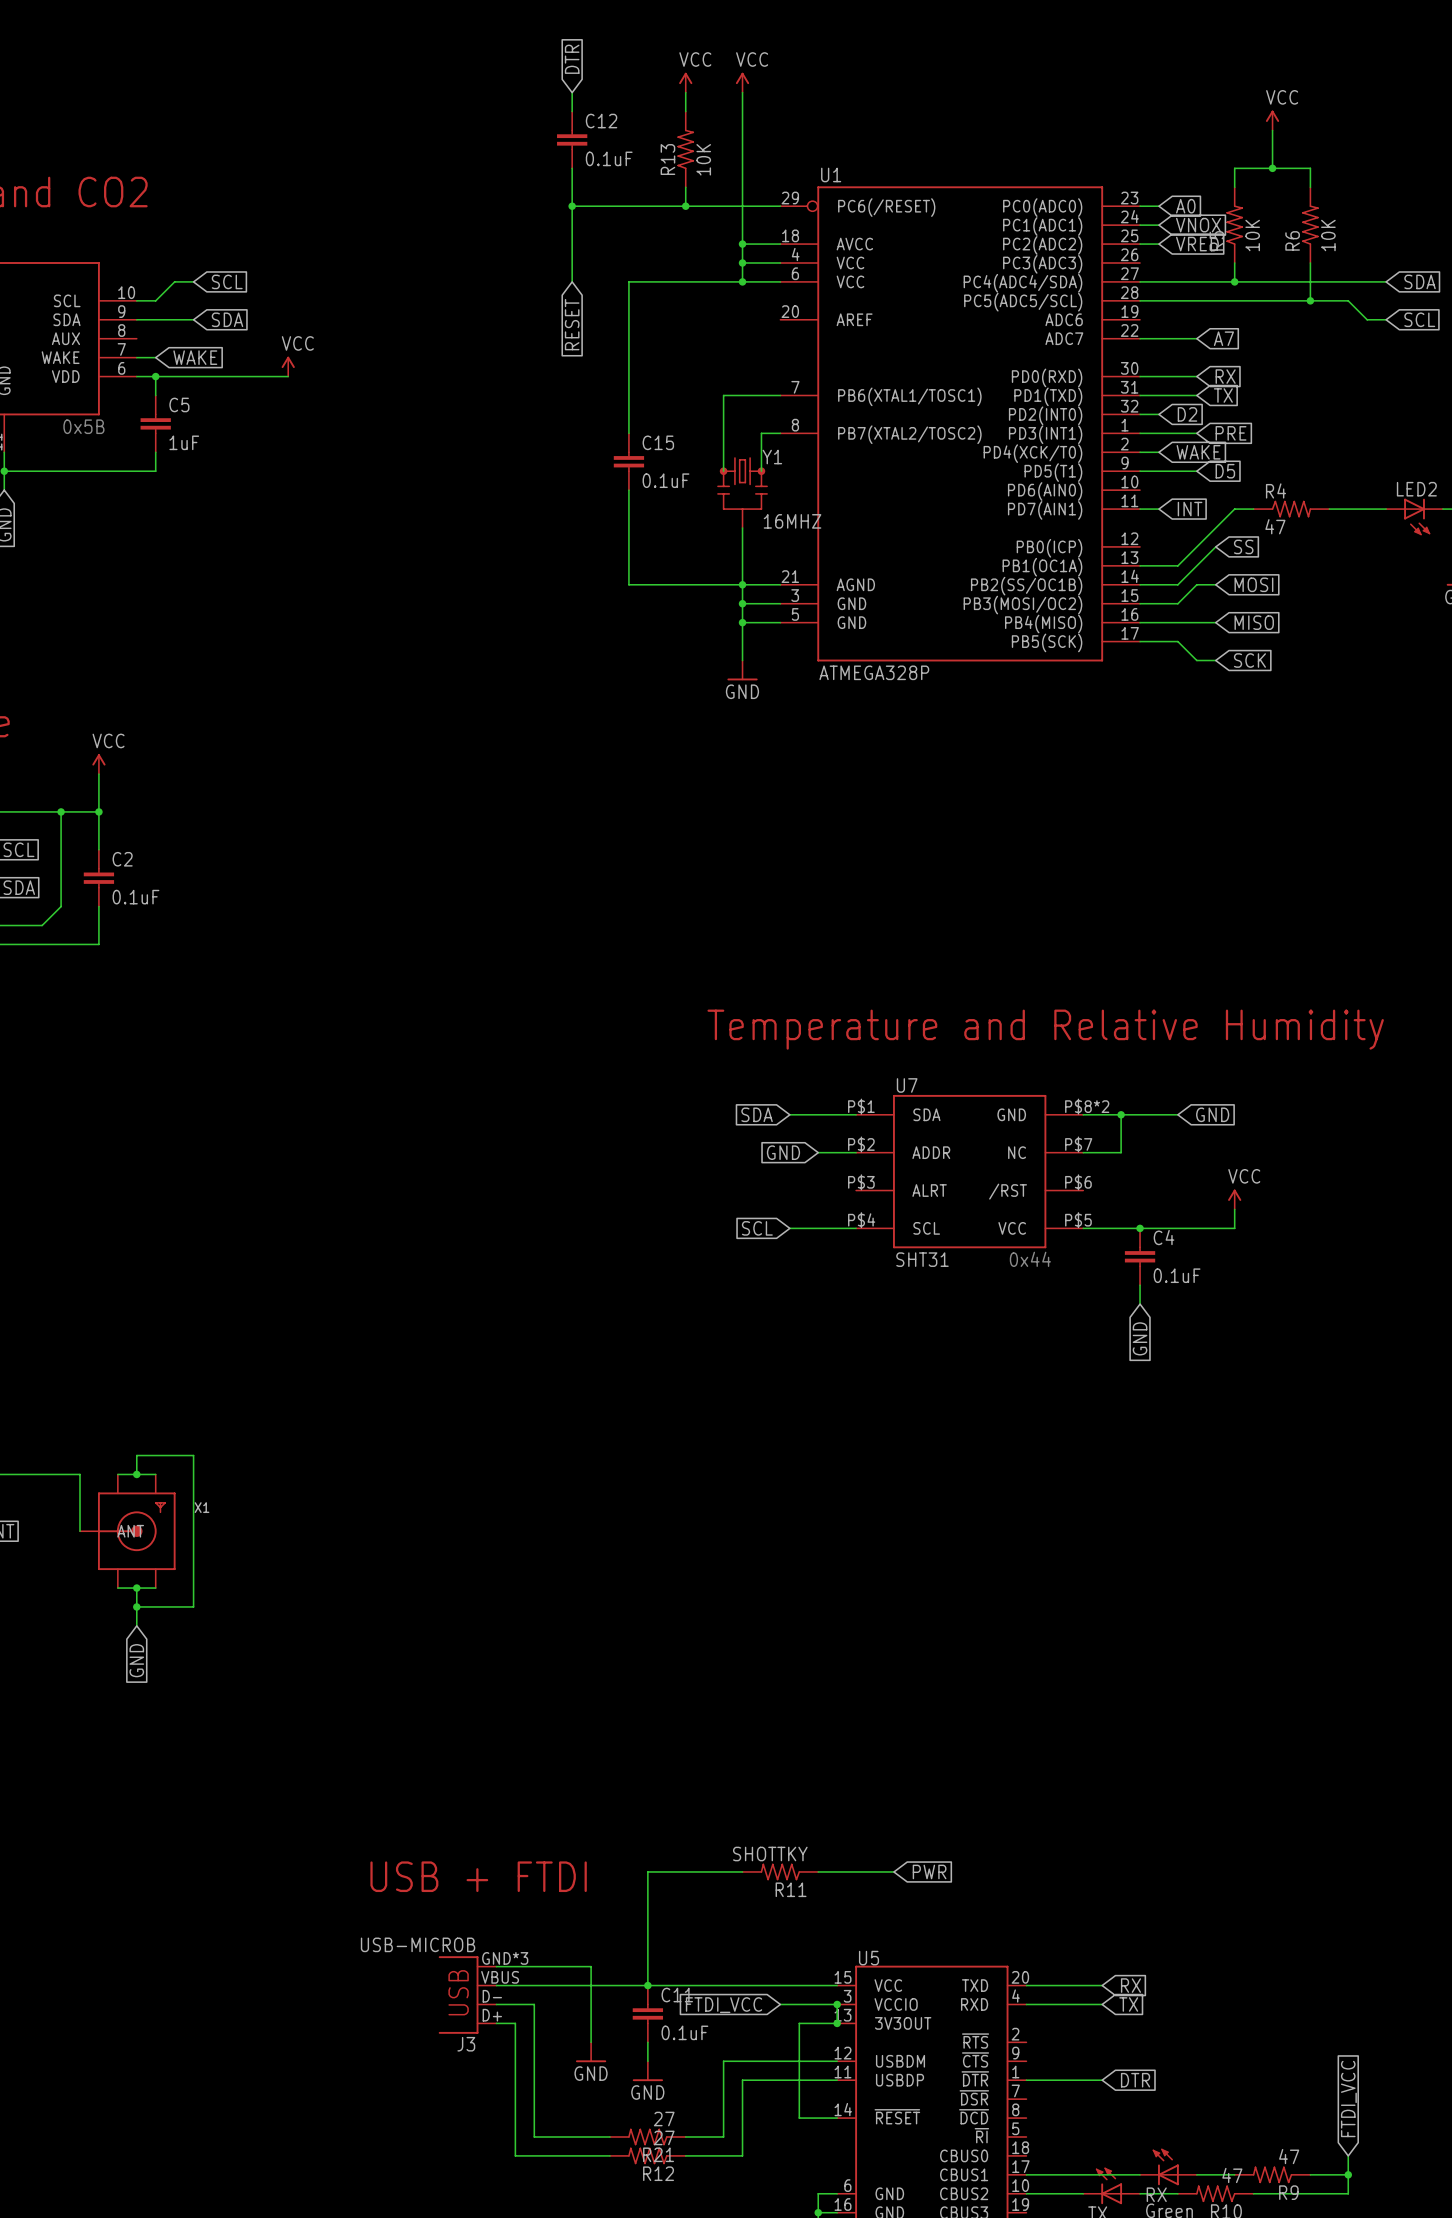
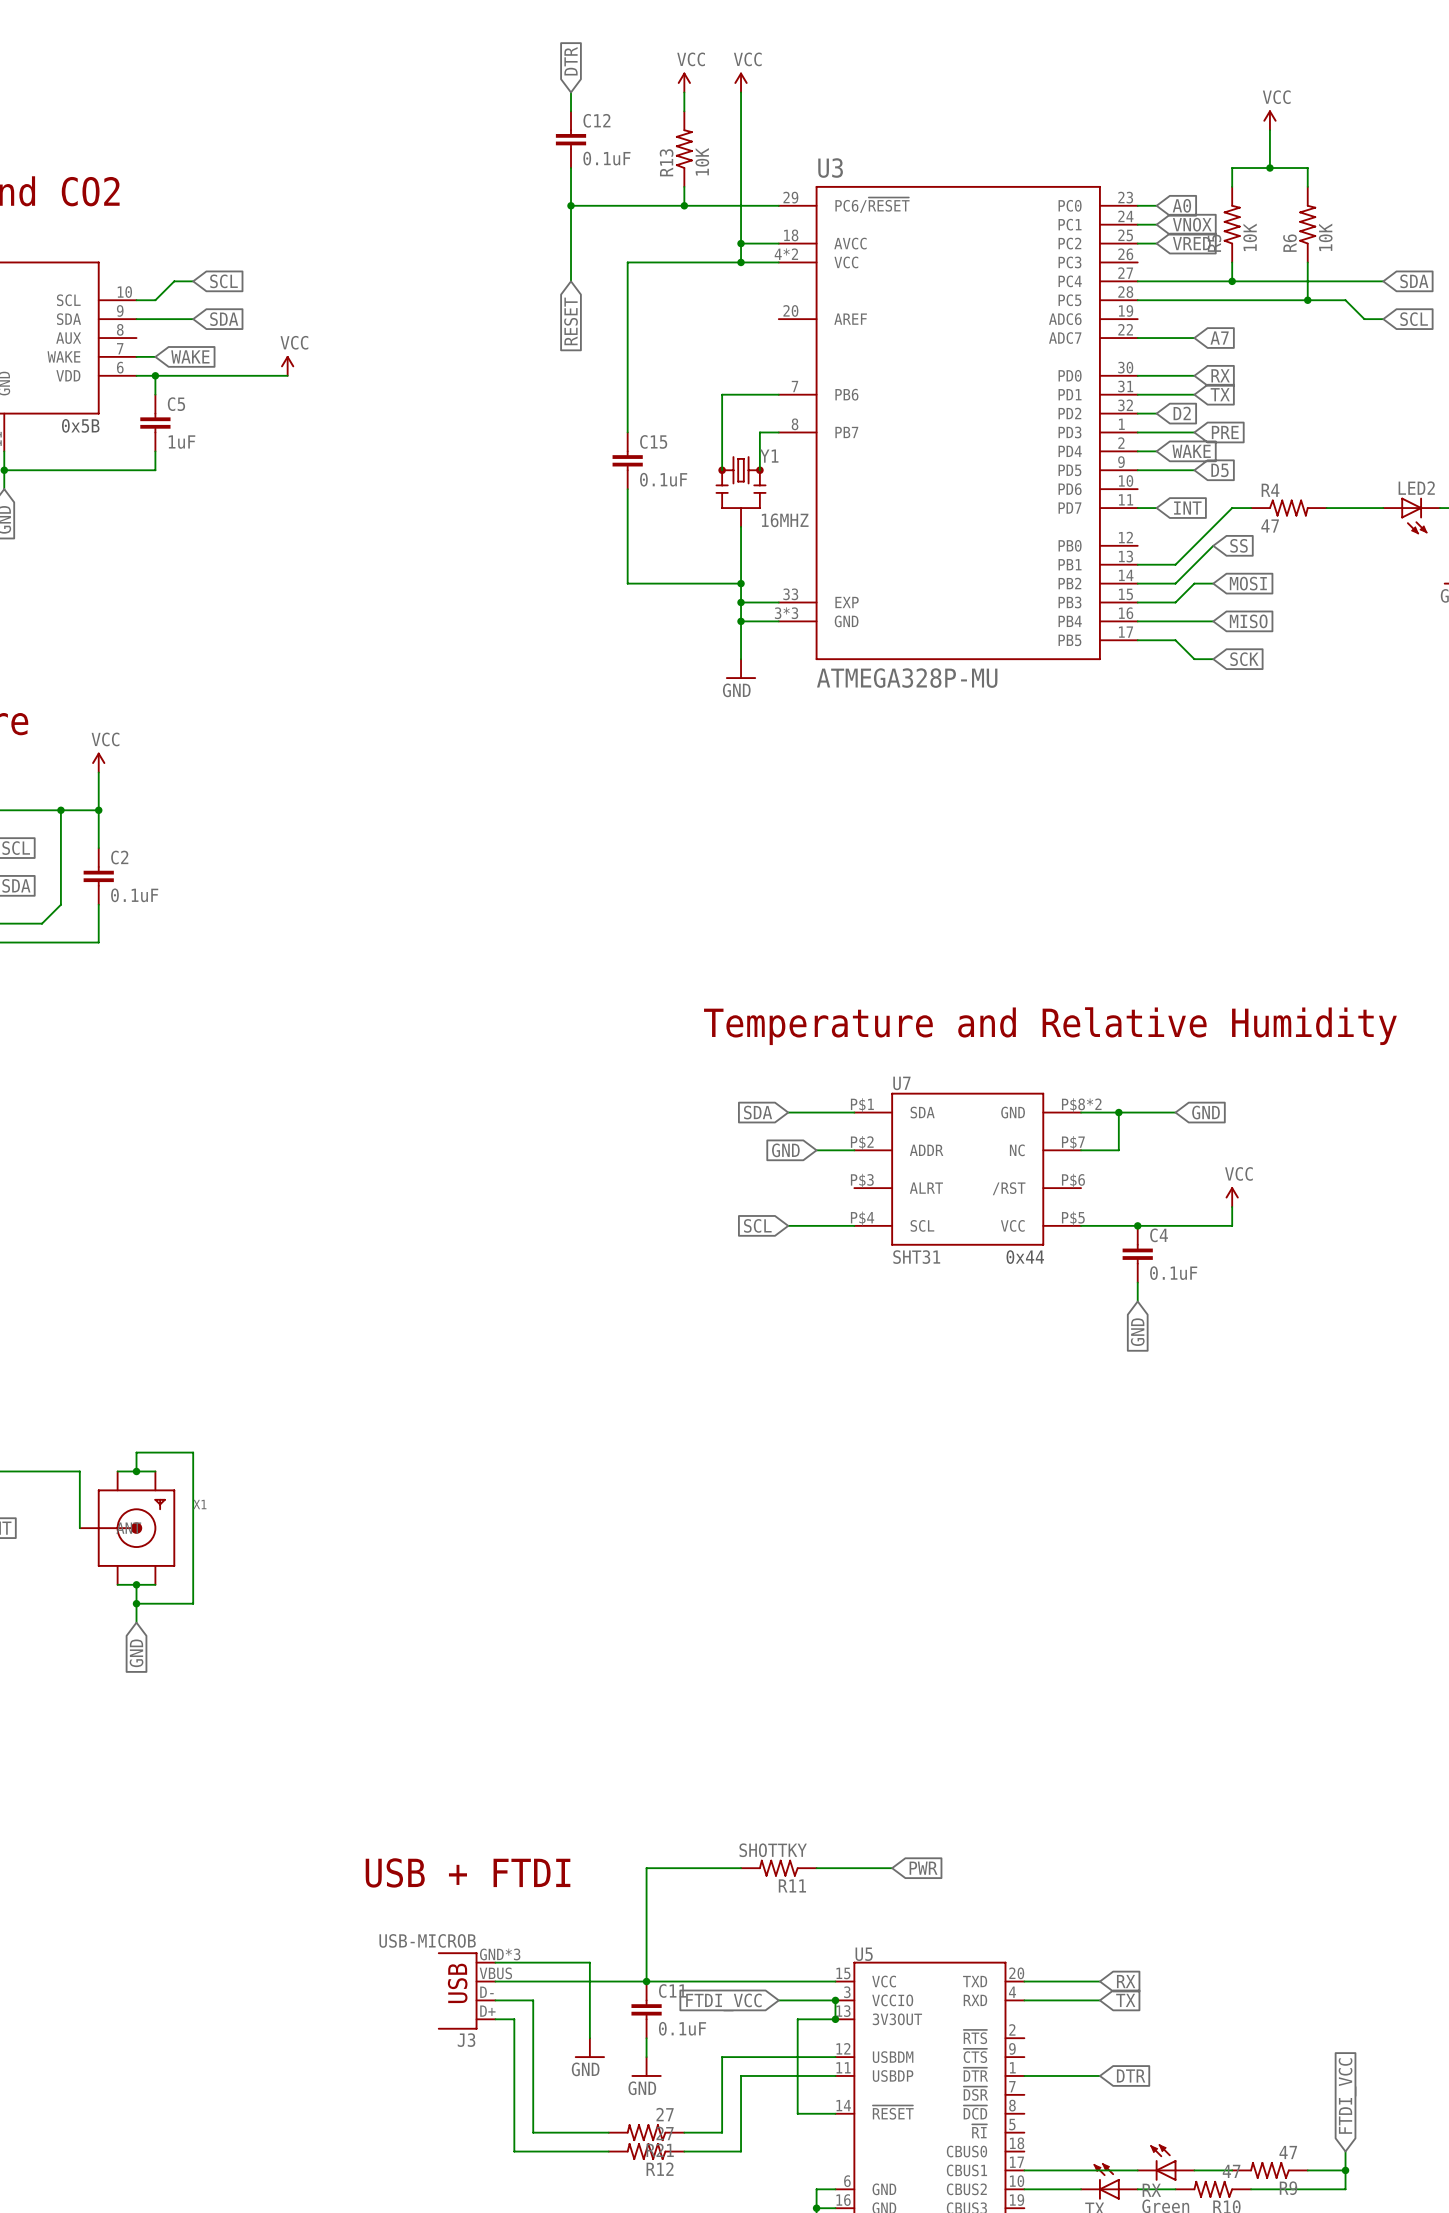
wire: (742, 262) (742, 281) -> none
wire: (628, 281) (780, 281) -> (627, 281) (627, 262) (741, 262)
junction: (742, 281) -> none
U1: ATMEGA328P (960, 423) -> none
U3: none -> ATMEGA328P-MU (958, 423)
wire: (742, 584) (780, 584) -> none

